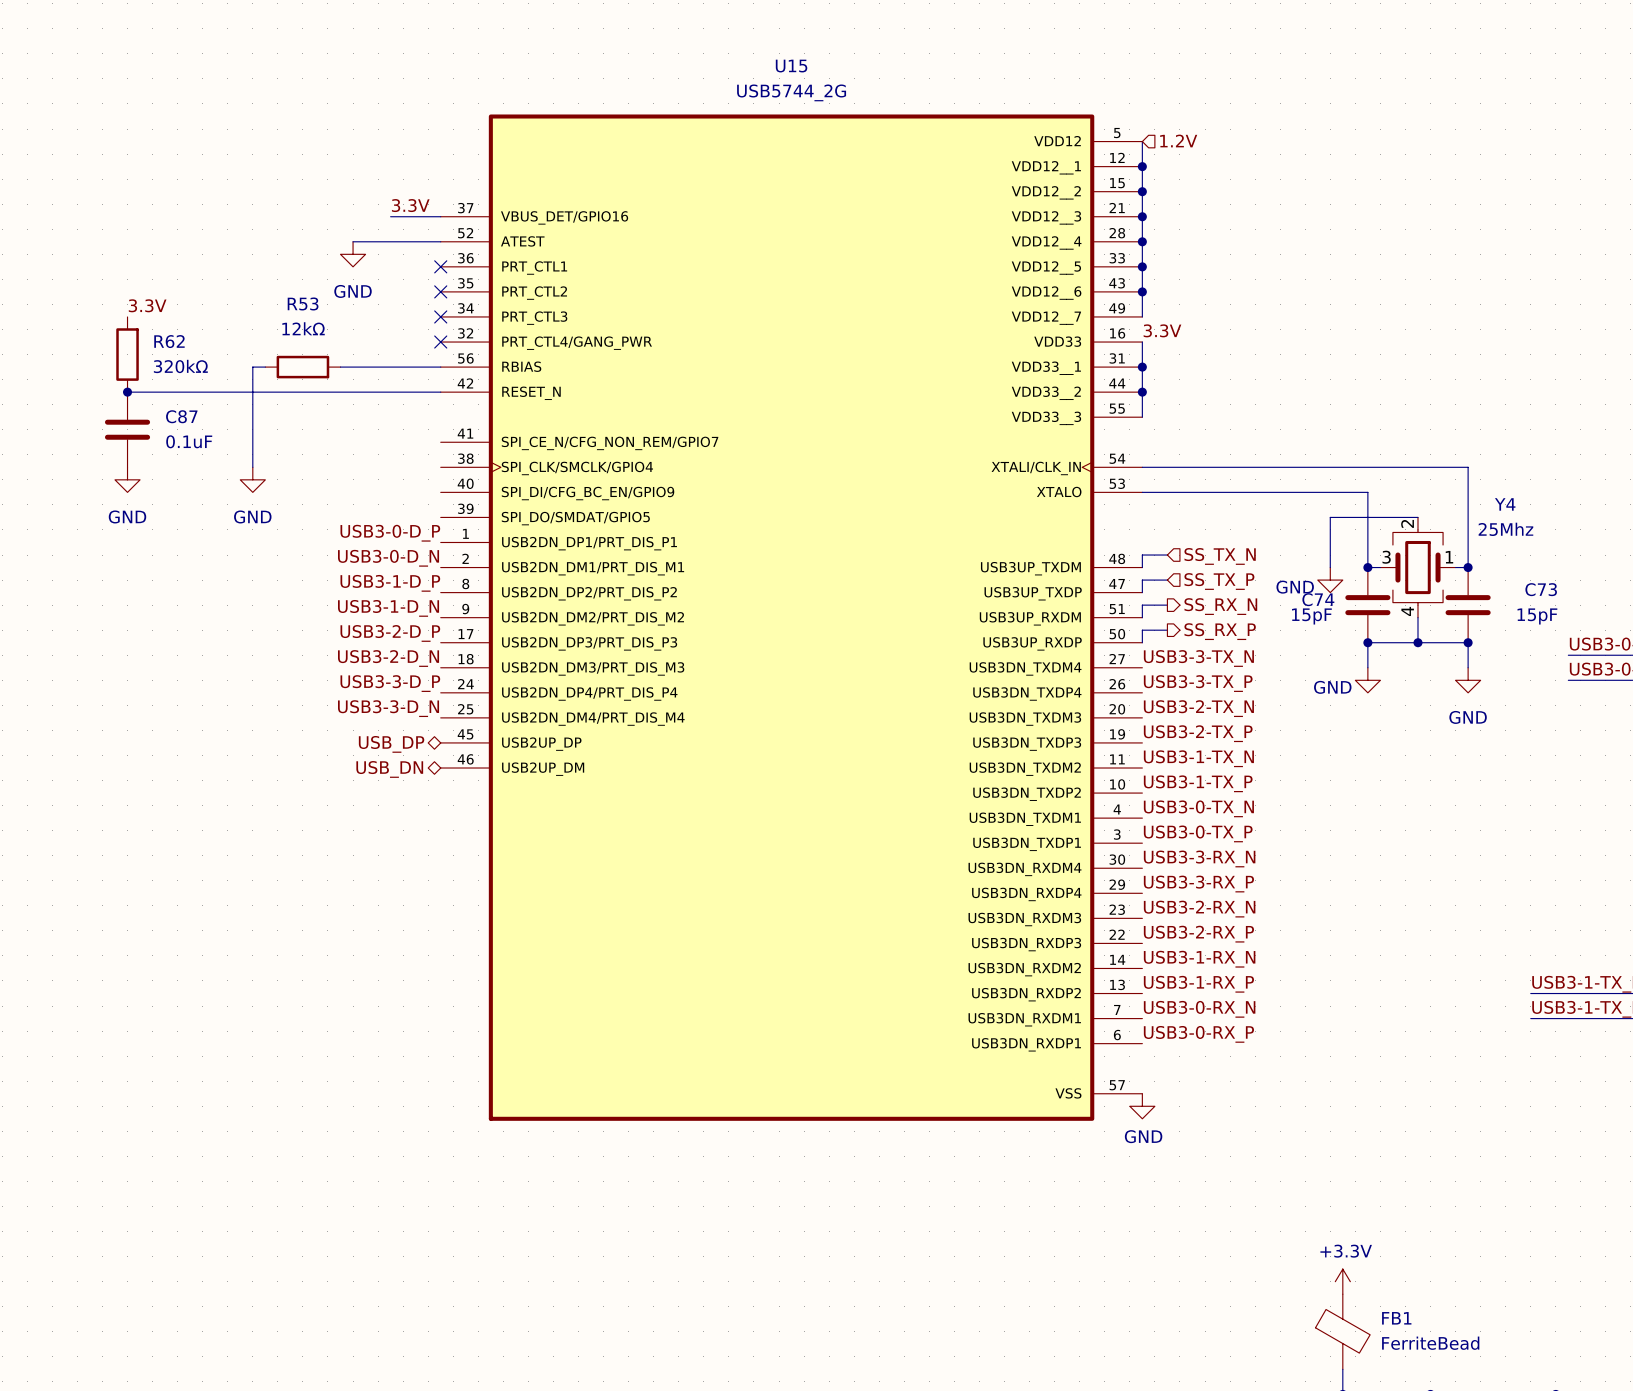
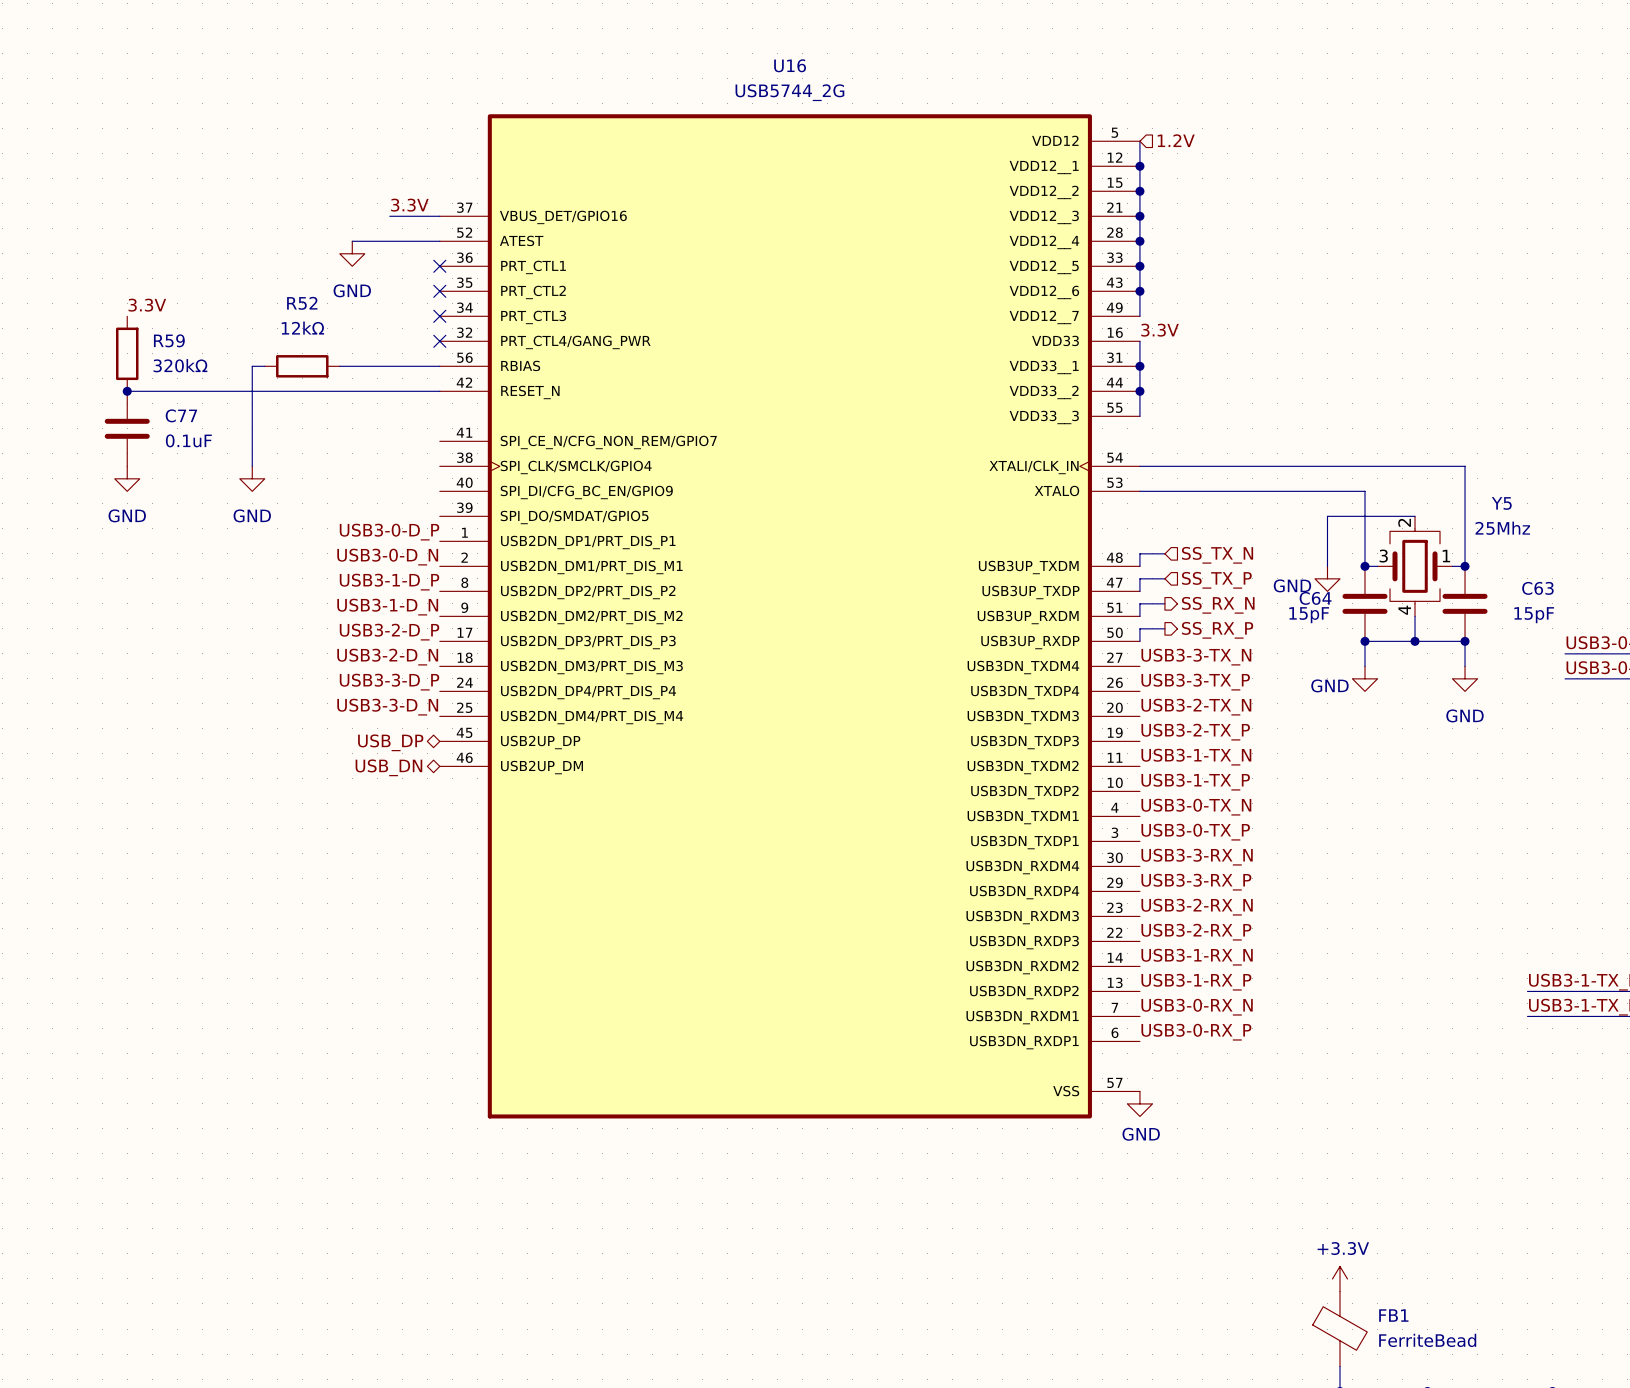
U15 name: U15 (791, 66) -> U16 (790, 65)
R53 name: R53 (303, 303) -> R52 (302, 303)
R62 name: R62 (169, 341) -> R59 (169, 340)
C87 name: C87 (181, 416) -> C77 (181, 415)
Y4 name: Y4 (1505, 504) -> Y5 (1501, 503)
C73 name: C73 (1541, 589) -> C63 (1537, 588)
C74 name: C74 (1318, 599) -> C64 (1315, 598)

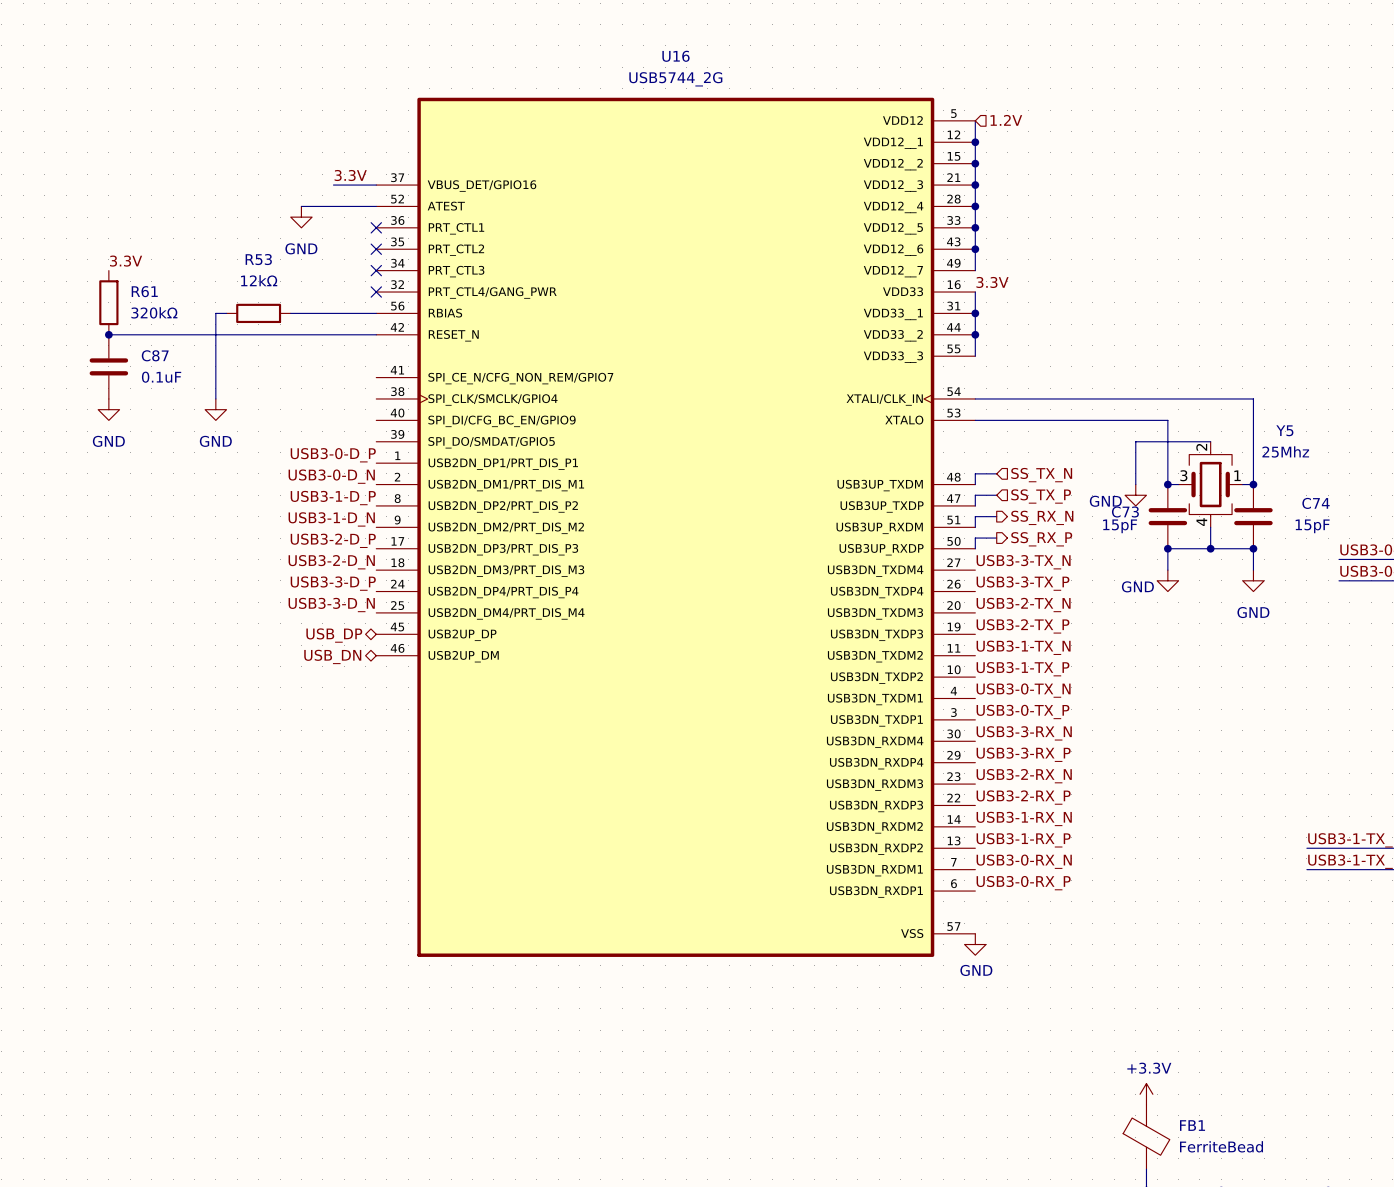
R52 name: R52 (302, 303) -> R53 (258, 259)
R59 name: R59 (169, 340) -> R61 (144, 291)
C77 name: C77 (181, 415) -> C87 (155, 355)
C63 name: C63 (1537, 588) -> C74 (1316, 503)
C64 name: C64 (1315, 598) -> C73 (1125, 511)

